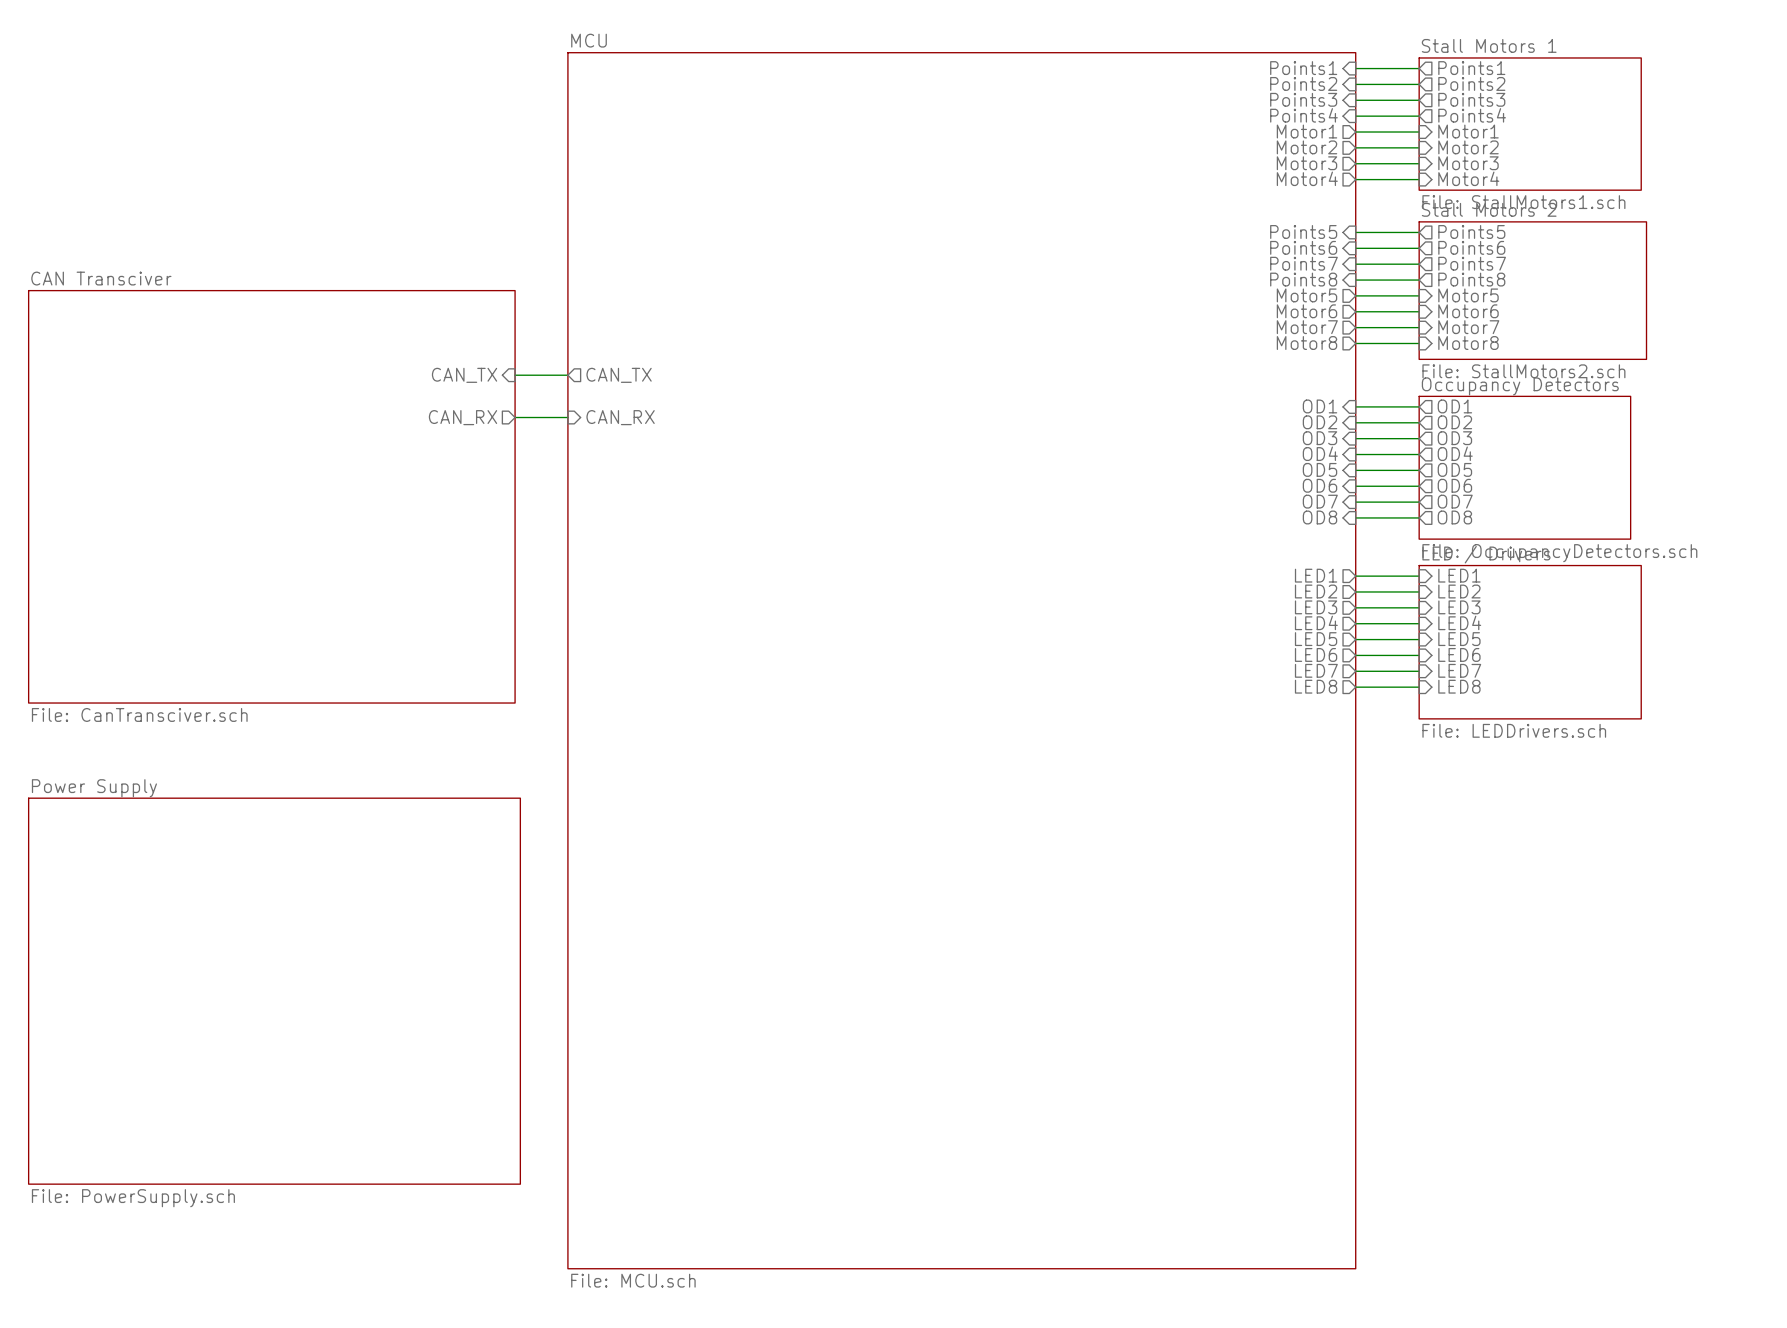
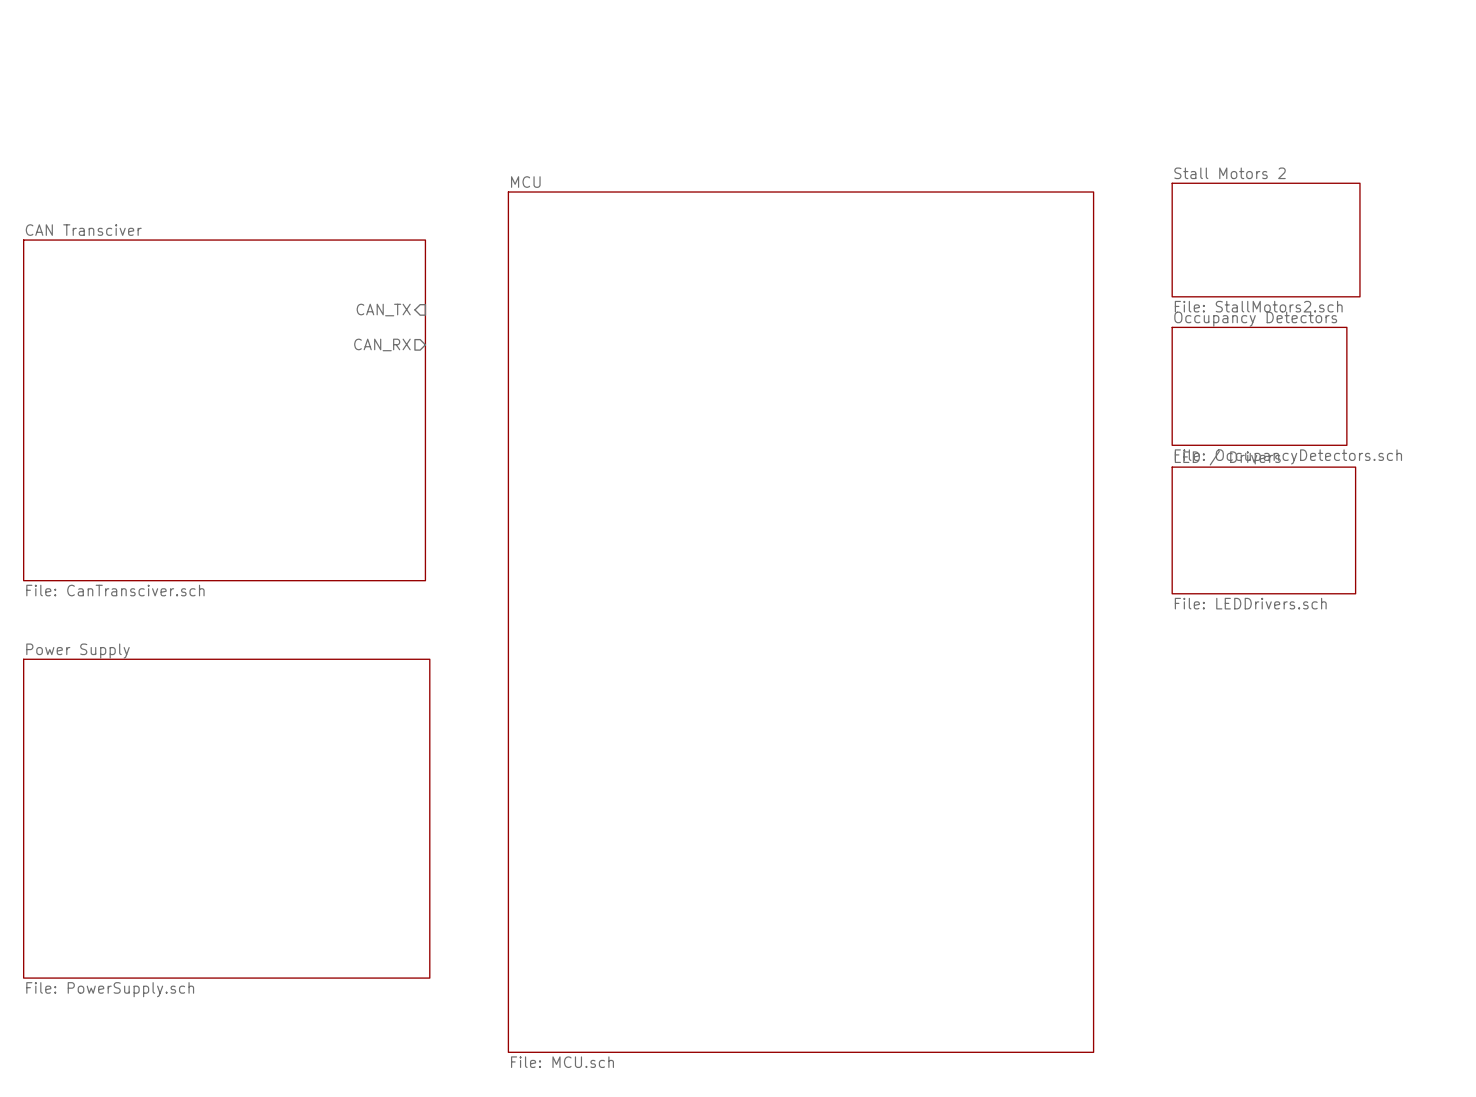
sheet pin: Points1 (1303, 68) -> none
wire: (1355, 68) (1419, 68) -> none
sheet pin: Points1 (1471, 68) -> none
sheet pin: Points2 (1303, 83) -> none
sheet pin: Points2 (1471, 83) -> none
wire: (1355, 84) (1419, 84) -> none
sheet pin: Points3 (1303, 99) -> none
sheet pin: Points3 (1471, 99) -> none
wire: (1355, 100) (1419, 100) -> none
sheet pin: Points4 (1303, 115) -> none
sheet pin: Points4 (1472, 115) -> none
wire: (1355, 116) (1419, 116) -> none
sheet Stall Motors 1: File: StallMotors1.sch (1530, 124) -> none
sheet pin: Motor1 (1306, 131) -> none
sheet pin: Motor1 (1468, 131) -> none
wire: (1355, 132) (1419, 132) -> none
sheet pin: Motor2 (1306, 147) -> none
wire: (1355, 147) (1419, 147) -> none
sheet pin: Motor2 (1468, 147) -> none
sheet pin: Motor3 (1306, 163) -> none
wire: (1355, 163) (1419, 163) -> none
sheet pin: Motor3 (1468, 163) -> none
sheet pin: Motor4 (1307, 178) -> none
sheet pin: Motor4 (1468, 178) -> none
wire: (1355, 179) (1419, 179) -> none
sheet pin: Points5 (1303, 231) -> none
sheet pin: Points5 (1471, 231) -> none
wire: (1355, 232) (1419, 232) -> none
sheet pin: Points6 (1303, 247) -> none
sheet pin: Points6 (1471, 247) -> none
wire: (1355, 248) (1419, 248) -> none
sheet pin: Points7 (1303, 263) -> none
sheet pin: Points7 (1472, 263) -> none
wire: (1355, 264) (1419, 264) -> none
sheet pin: Points8 (1303, 279) -> none
sheet pin: Points8 (1471, 279) -> none
wire: (1355, 280) (1419, 280) -> none
sheet pin: Motor5 (1306, 295) -> none
wire: (1355, 295) (1419, 295) -> none
sheet pin: Motor5 (1468, 295) -> none
sheet pin: Motor6 (1306, 311) -> none
wire: (1355, 311) (1419, 311) -> none
sheet pin: Motor6 (1468, 311) -> none
sheet pin: Motor7 (1307, 327) -> none
wire: (1355, 327) (1419, 327) -> none
sheet pin: Motor7 (1468, 327) -> none
sheet pin: Motor8 (1306, 343) -> none
wire: (1355, 343) (1419, 343) -> none
sheet pin: Motor8 (1468, 343) -> none
wire: (515, 375) (567, 375) -> none
sheet pin: CAN_TX (619, 375) -> none
sheet pin: OD1 (1319, 406) -> none
wire: (1355, 406) (1419, 406) -> none
sheet pin: OD1 (1454, 406) -> none
wire: (515, 417) (567, 417) -> none
sheet pin: CAN_RX (620, 417) -> none
sheet pin: OD2 (1319, 422) -> none
wire: (1355, 422) (1419, 422) -> none
sheet pin: OD2 (1454, 422) -> none
sheet pin: OD3 (1319, 438) -> none
wire: (1355, 438) (1419, 438) -> none
sheet pin: OD3 (1454, 438) -> none
sheet pin: OD4 (1320, 453) -> none
sheet pin: OD4 (1455, 453) -> none
wire: (1355, 454) (1419, 454) -> none
sheet pin: OD5 (1319, 469) -> none
sheet pin: OD5 (1454, 469) -> none
wire: (1355, 470) (1419, 470) -> none
sheet pin: OD6 (1319, 485) -> none
sheet pin: OD6 (1454, 485) -> none
wire: (1355, 486) (1419, 486) -> none
sheet pin: OD7 (1320, 501) -> none
sheet pin: OD7 (1455, 501) -> none
wire: (1355, 502) (1419, 502) -> none
sheet pin: OD8 (1319, 517) -> none
wire: (1355, 517) (1419, 517) -> none
sheet pin: OD8 (1454, 517) -> none
sheet pin: LED1 (1316, 575) -> none
sheet pin: LED1 (1459, 575) -> none
wire: (1355, 576) (1419, 576) -> none
sheet pin: LED2 (1316, 591) -> none
wire: (1355, 591) (1419, 591) -> none
sheet pin: LED2 (1459, 591) -> none
sheet pin: LED3 (1316, 607) -> none
wire: (1355, 607) (1419, 607) -> none
sheet pin: LED3 (1459, 607) -> none
sheet pin: LED4 (1316, 622) -> none
sheet pin: LED4 (1459, 622) -> none
wire: (1355, 623) (1419, 623) -> none
sheet pin: LED5 (1316, 639) -> none
wire: (1355, 639) (1419, 639) -> none
sheet pin: LED5 (1459, 639) -> none
sheet pin: LED6 (1316, 654) -> none
sheet pin: LED6 (1459, 654) -> none
wire: (1355, 655) (1419, 655) -> none
sheet MCU: File: MCU.sch (961, 660) -> none
sheet pin: LED7 (1316, 670) -> none
sheet pin: LED7 (1459, 670) -> none
wire: (1355, 671) (1419, 671) -> none
sheet pin: LED8 (1316, 686) -> none
sheet pin: LED8 (1459, 686) -> none
wire: (1355, 687) (1419, 687) -> none
sheet MCU: none -> File: MCU.sch (800, 622)

